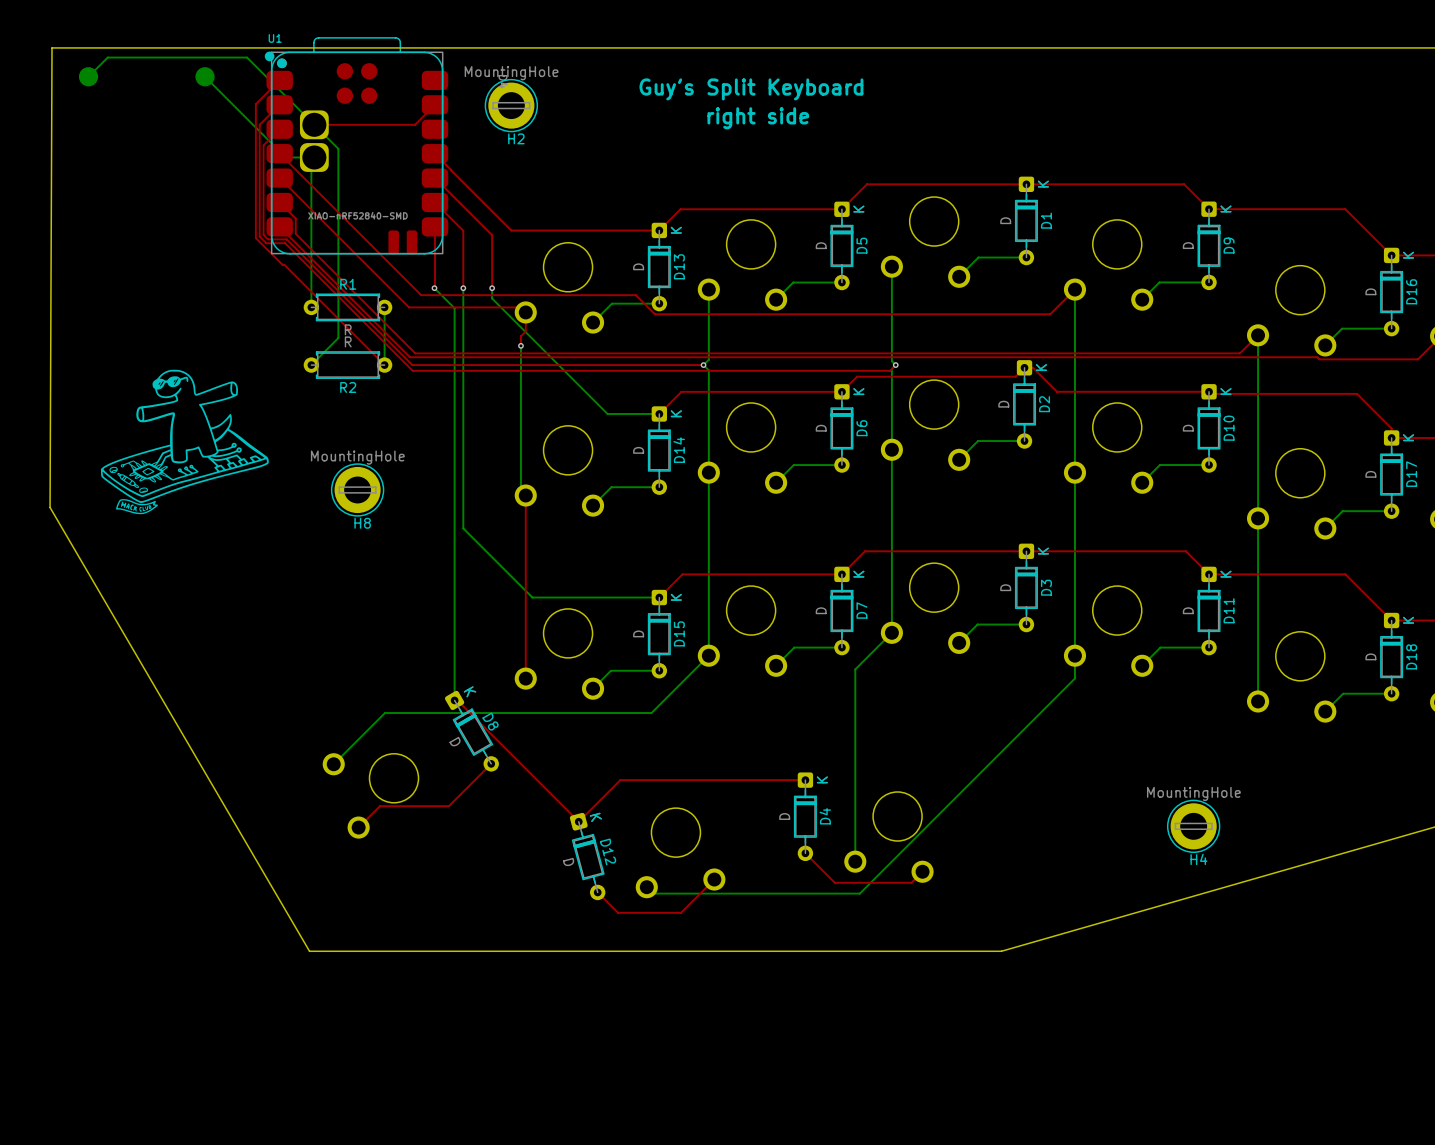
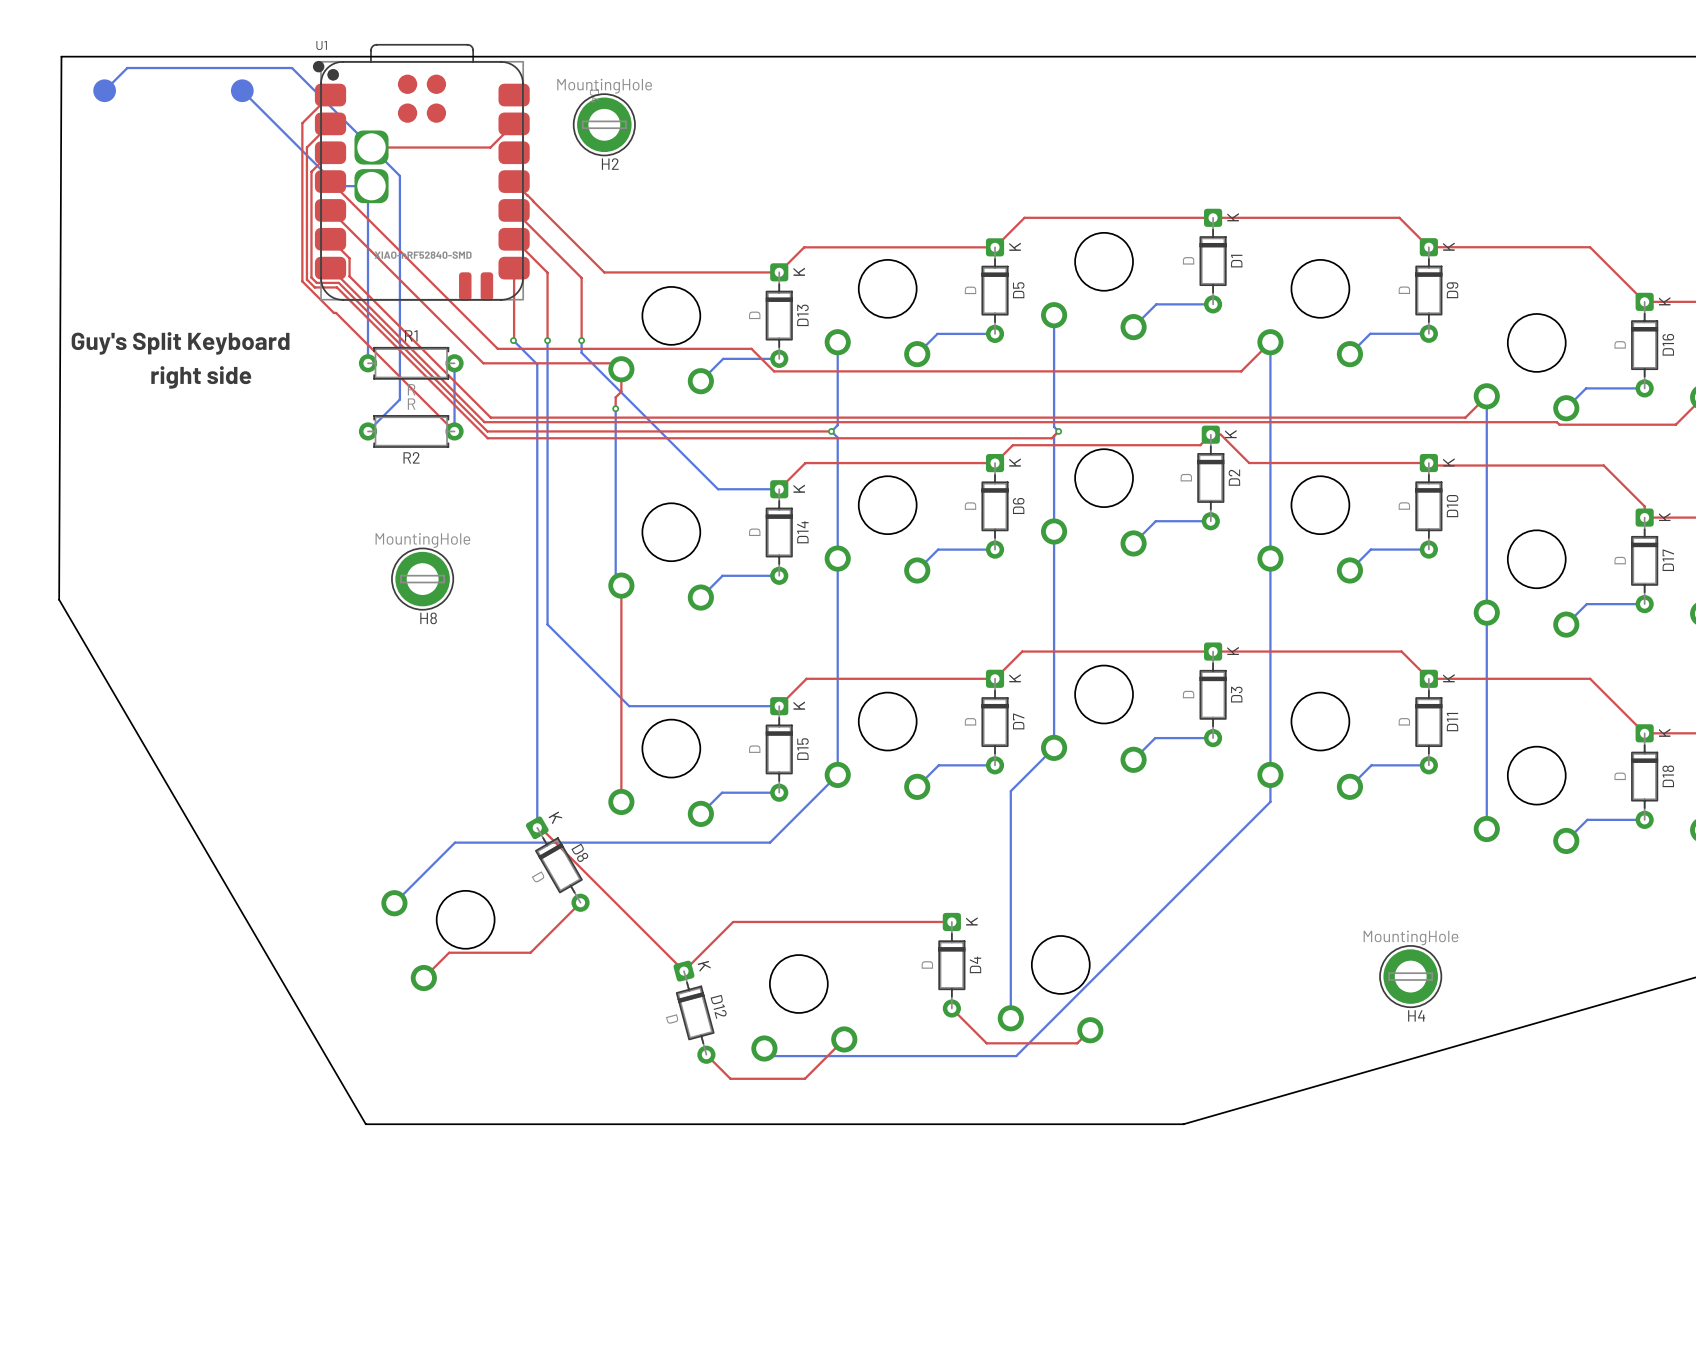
text: Guy's Split Keyboard (751, 89) -> none
text: right side (758, 118) -> none
text: none -> Guy's Split Keyboard (180, 343)
text: none -> right side (201, 377)
drawing: [100, 369, 269, 515] -> none

